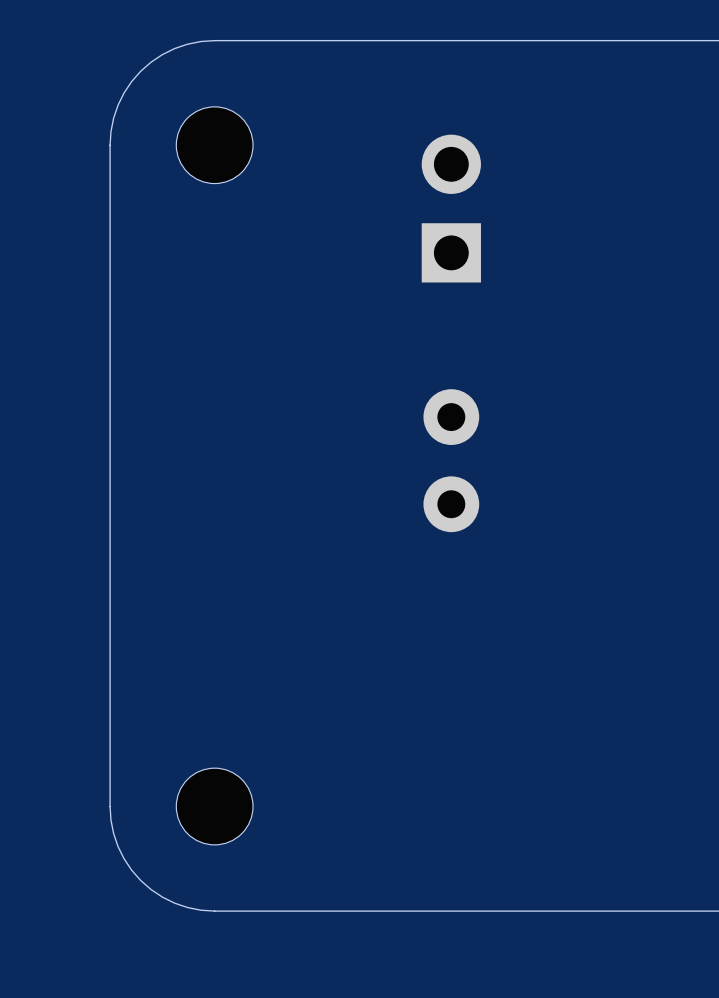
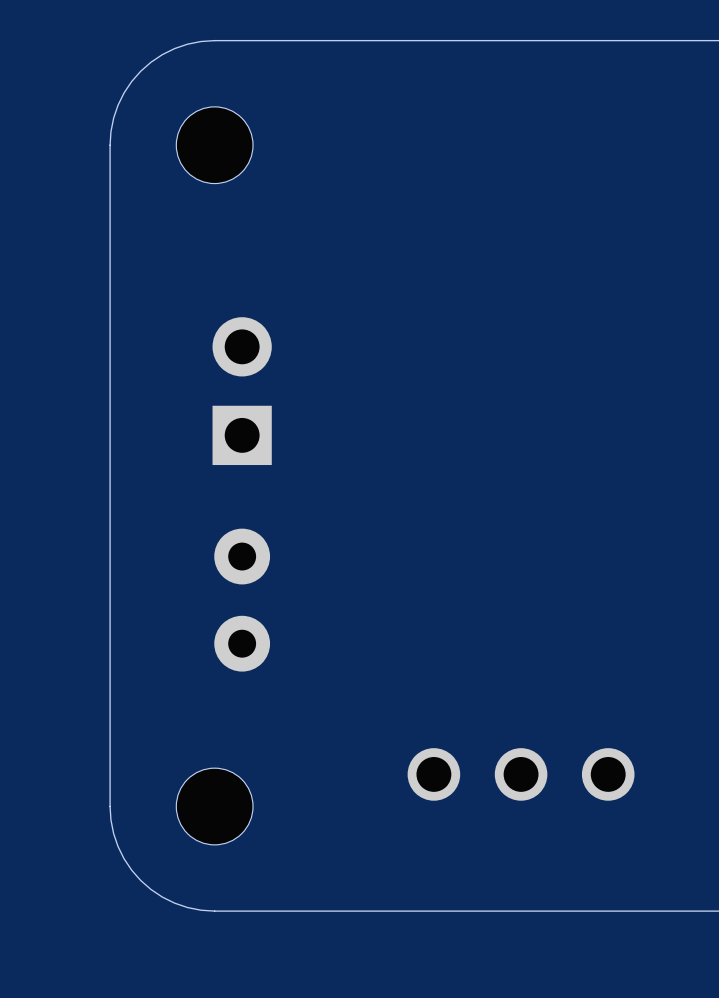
part position: (451, 208) -> (242, 391)
part position: (451, 460) -> (242, 600)
part: none -> (521, 774)

